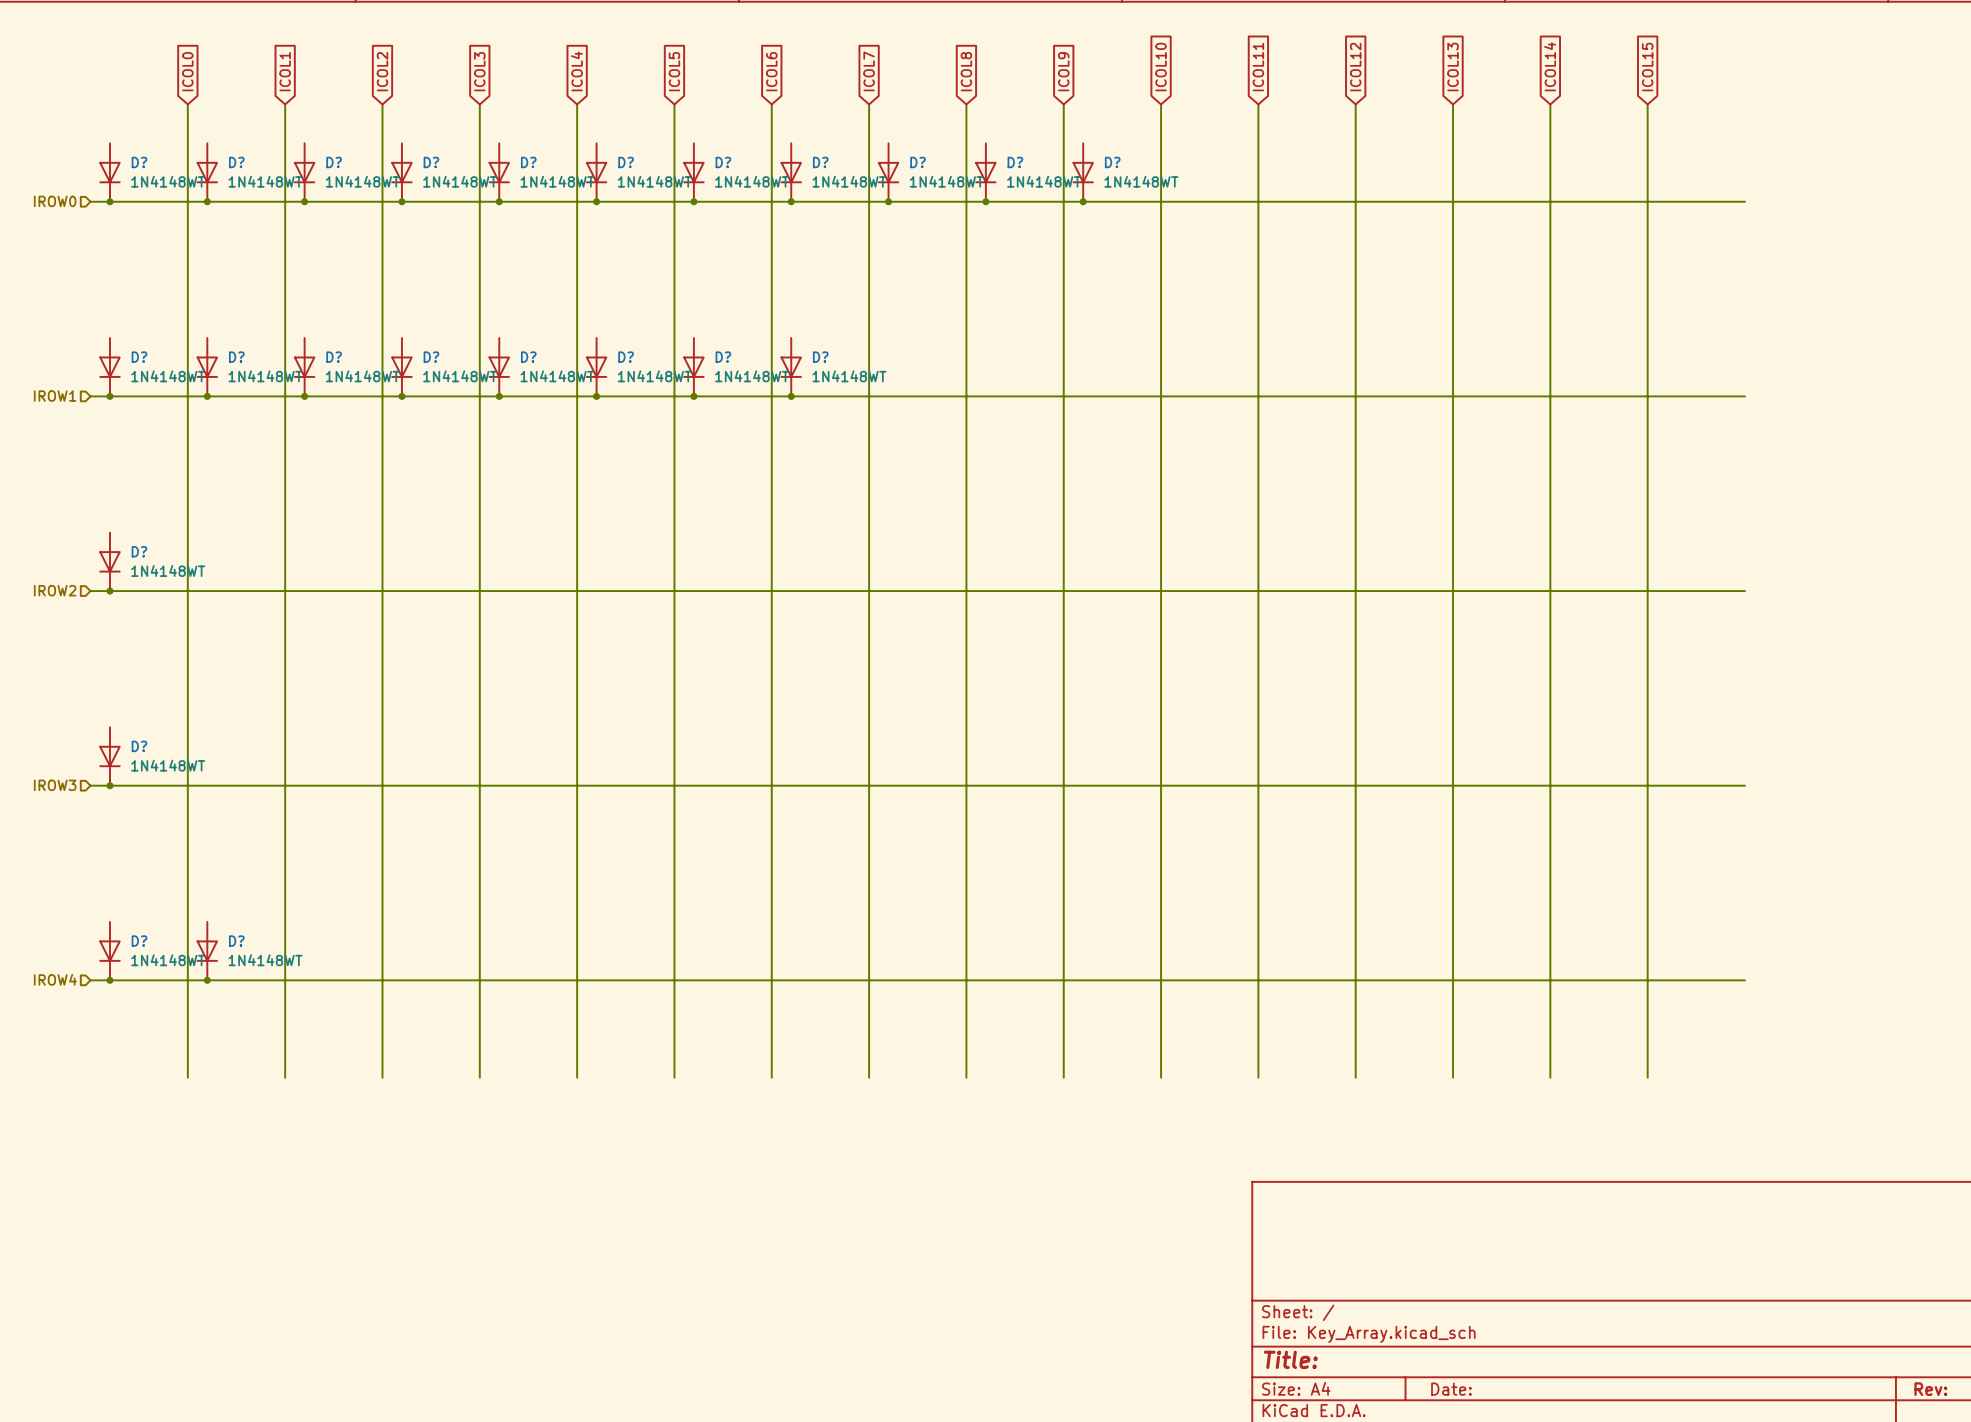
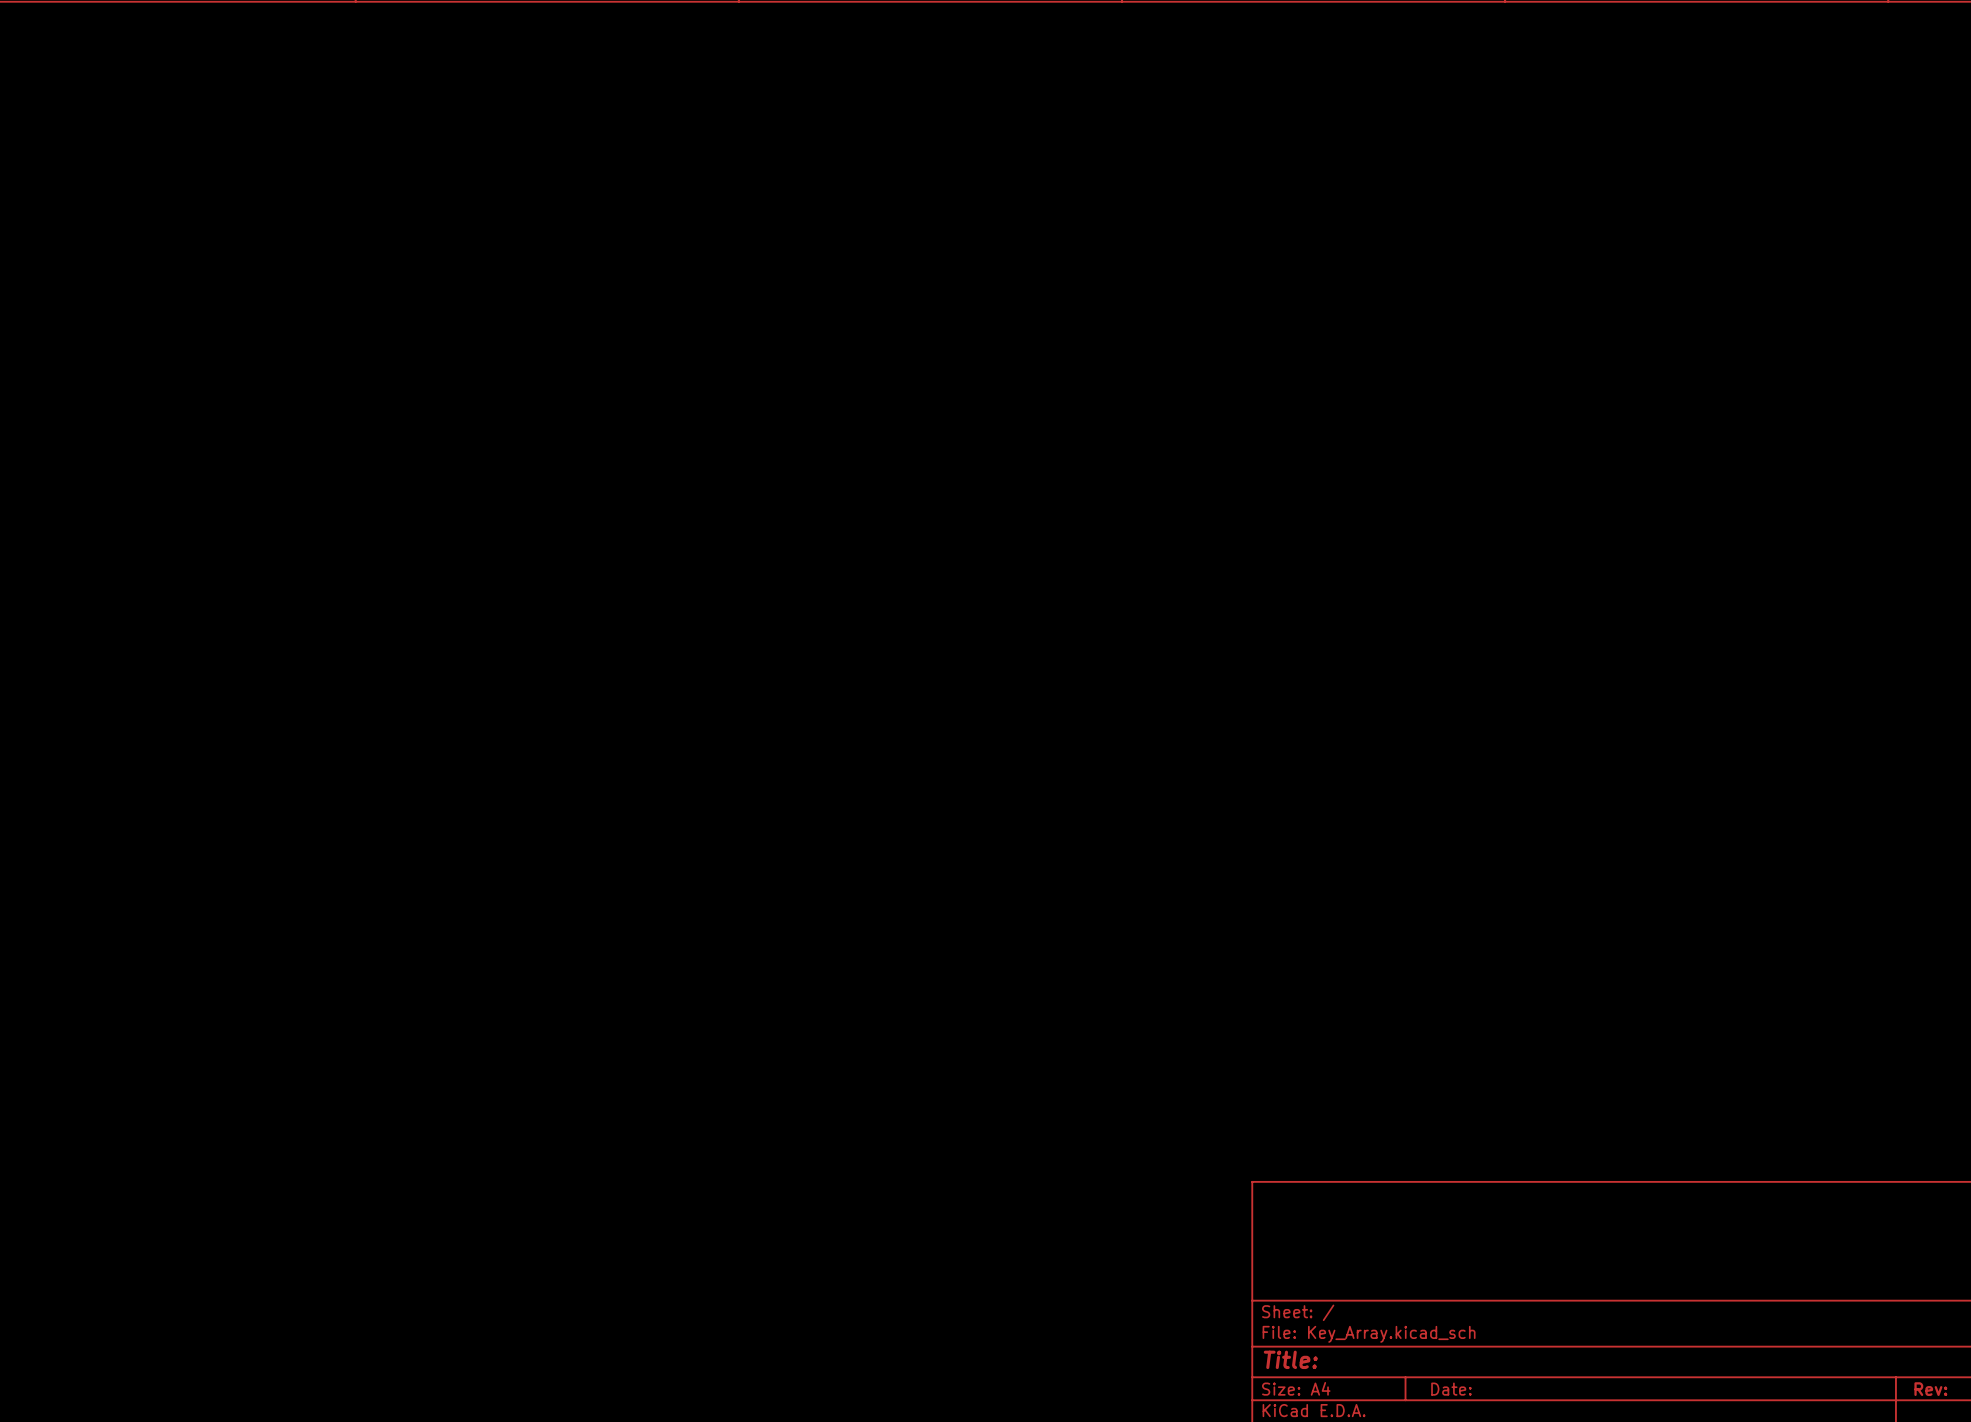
global label: ICOL14 (1550, 66) -> none
global label: ICOL10 (1161, 67) -> none
global label: ICOL11 (1258, 67) -> none
global label: ICOL12 (1355, 67) -> none
global label: ICOL13 (1453, 67) -> none
global label: ICOL15 (1647, 67) -> none
global label: ICOL0 (187, 71) -> none
global label: ICOL1 (285, 71) -> none
global label: ICOL2 (382, 71) -> none
global label: ICOL3 (479, 71) -> none
global label: ICOL4 (576, 71) -> none
global label: ICOL5 (674, 71) -> none
global label: ICOL6 (771, 71) -> none
global label: ICOL7 (869, 71) -> none
global label: ICOL8 (966, 71) -> none
global label: ICOL9 (1063, 71) -> none
wire: (187, 104) (187, 1077) -> none
wire: (285, 104) (285, 1077) -> none
wire: (382, 104) (382, 1077) -> none
wire: (479, 104) (479, 1077) -> none
wire: (577, 104) (577, 1077) -> none
wire: (674, 104) (674, 1077) -> none
wire: (771, 104) (771, 1077) -> none
wire: (869, 104) (869, 1077) -> none
wire: (966, 104) (966, 1077) -> none
wire: (1063, 104) (1063, 1077) -> none
wire: (1161, 104) (1161, 1077) -> none
wire: (1258, 104) (1258, 1077) -> none
wire: (1355, 104) (1355, 1077) -> none
wire: (1453, 104) (1453, 1077) -> none
wire: (1550, 104) (1550, 1077) -> none
wire: (1647, 104) (1647, 1077) -> none
D?: 1N4148WT (109, 172) -> none
D?: 1N4148WT (207, 172) -> none
D?: 1N4148WT (304, 172) -> none
D?: 1N4148WT (401, 172) -> none
D?: 1N4148WT (499, 172) -> none
D?: 1N4148WT (596, 172) -> none
D?: 1N4148WT (693, 172) -> none
D?: 1N4148WT (791, 172) -> none
D?: 1N4148WT (888, 172) -> none
D?: 1N4148WT (985, 172) -> none
D?: 1N4148WT (1083, 172) -> none
hierarchical label: IROW0 (55, 201) -> none
wire: (90, 201) (1745, 201) -> none
junction: (109, 201) -> none
junction: (207, 201) -> none
junction: (304, 201) -> none
junction: (401, 201) -> none
junction: (499, 201) -> none
junction: (596, 201) -> none
junction: (693, 201) -> none
junction: (791, 201) -> none
junction: (888, 201) -> none
junction: (985, 201) -> none
junction: (1083, 201) -> none
D?: 1N4148WT (109, 367) -> none
D?: 1N4148WT (207, 367) -> none
D?: 1N4148WT (304, 367) -> none
D?: 1N4148WT (401, 367) -> none
D?: 1N4148WT (499, 367) -> none
D?: 1N4148WT (596, 367) -> none
D?: 1N4148WT (693, 367) -> none
D?: 1N4148WT (791, 367) -> none
hierarchical label: IROW1 (55, 396) -> none
wire: (90, 396) (1745, 396) -> none
junction: (109, 396) -> none
junction: (207, 396) -> none
junction: (304, 396) -> none
junction: (401, 396) -> none
junction: (499, 396) -> none
junction: (596, 396) -> none
junction: (693, 396) -> none
junction: (791, 396) -> none
D?: 1N4148WT (109, 561) -> none
hierarchical label: IROW2 (55, 590) -> none
wire: (90, 591) (1745, 591) -> none
junction: (109, 591) -> none
D?: 1N4148WT (109, 756) -> none
hierarchical label: IROW3 (55, 785) -> none
wire: (90, 785) (1745, 785) -> none
junction: (109, 785) -> none
D?: 1N4148WT (109, 951) -> none
D?: 1N4148WT (207, 951) -> none
hierarchical label: IROW4 (55, 979) -> none
wire: (90, 980) (1745, 980) -> none
junction: (109, 980) -> none
junction: (207, 980) -> none

